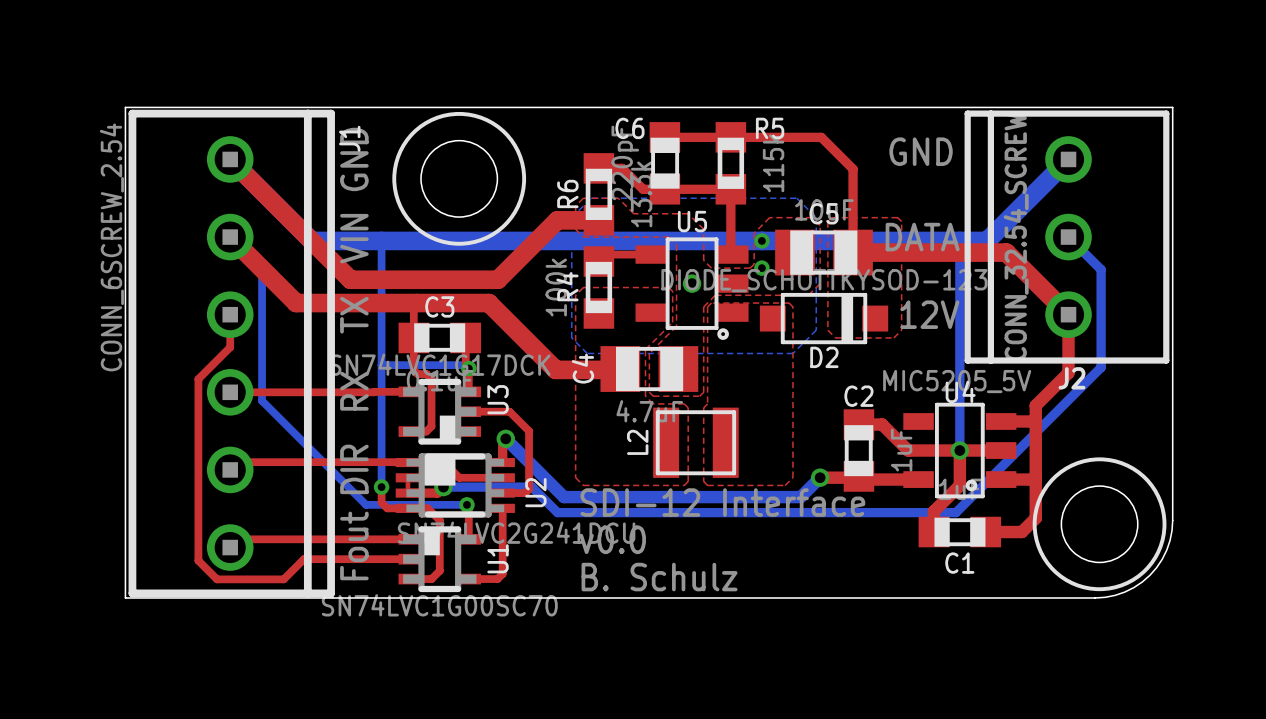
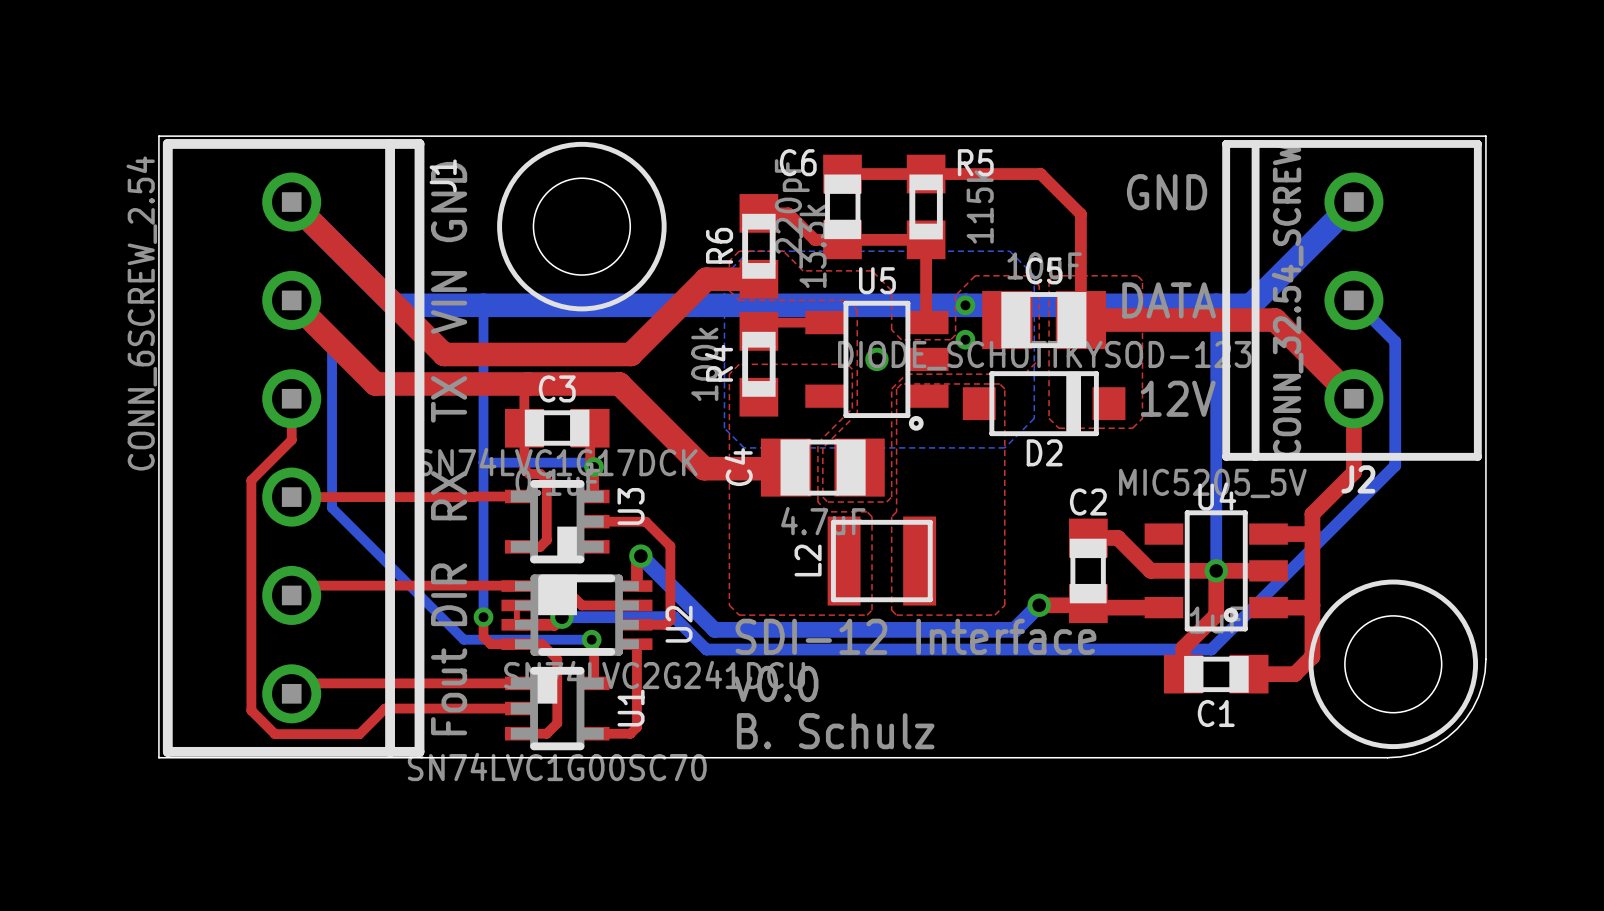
C2 value: 1uF (901, 450) -> none

